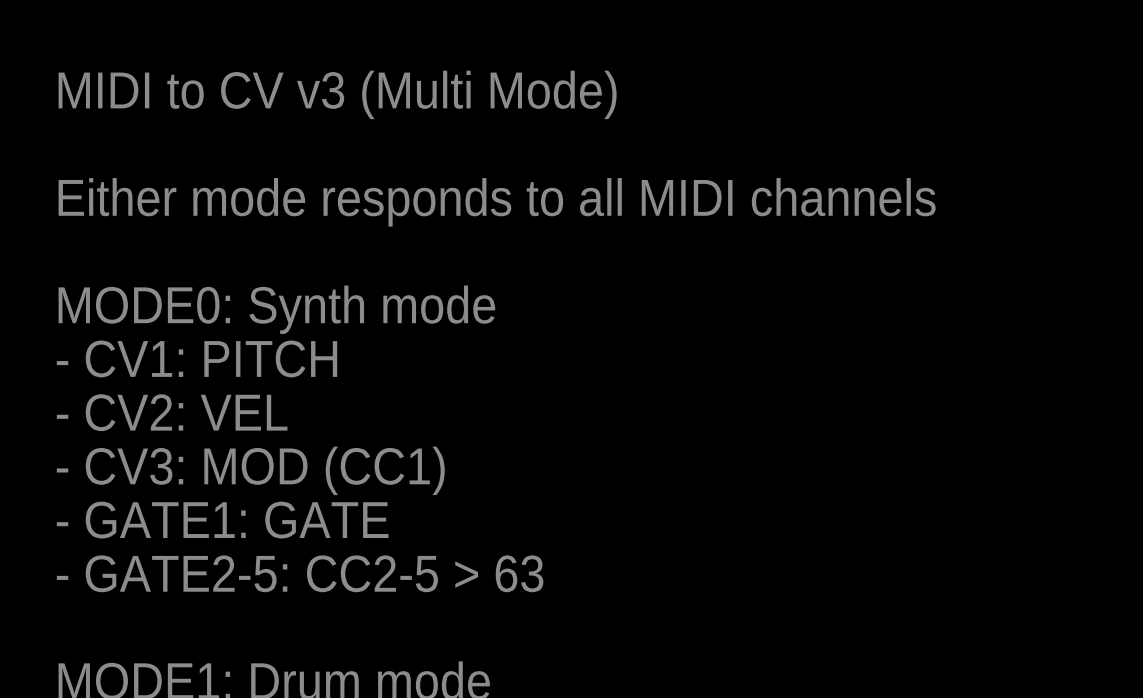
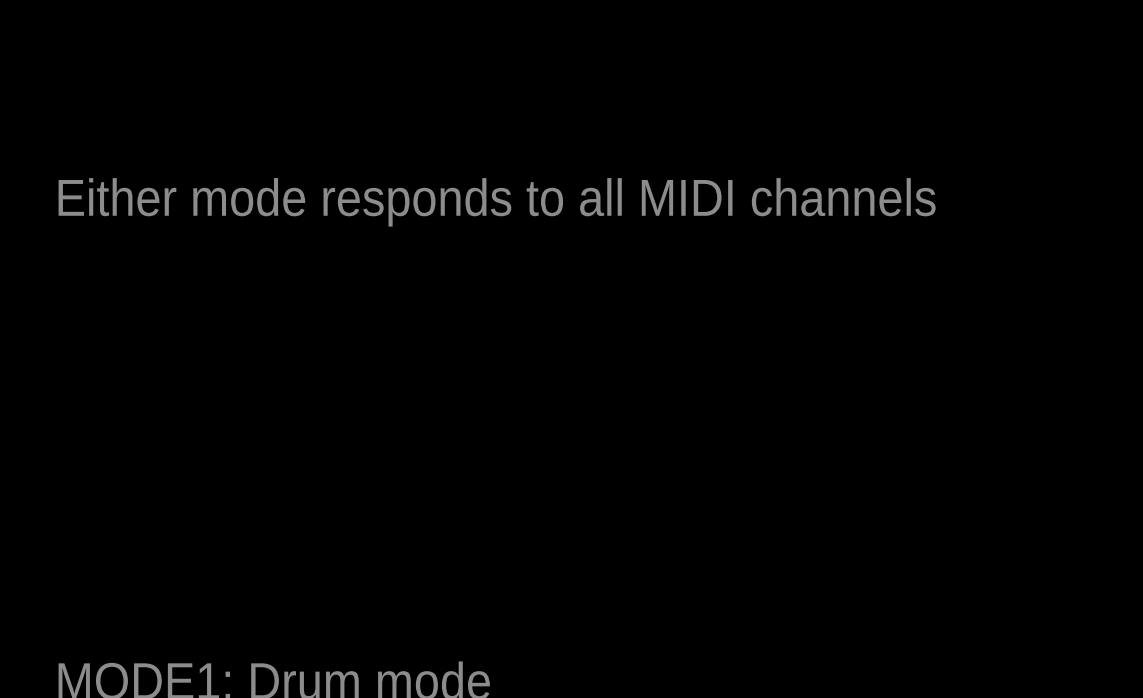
text: MIDI to CV v3 (Multi Mode) (337, 94) -> none
text: MODE0: Synth mode (276, 309) -> none
text: - CV1: PITCH (197, 358) -> none
text: - CV2: VEL (172, 412) -> none
text: - CV3: MOD (CC1) (250, 470) -> none
text: - GATE1: GATE (222, 520) -> none
text: - GATE2-5: CC2-5 > 63 (300, 573) -> none

